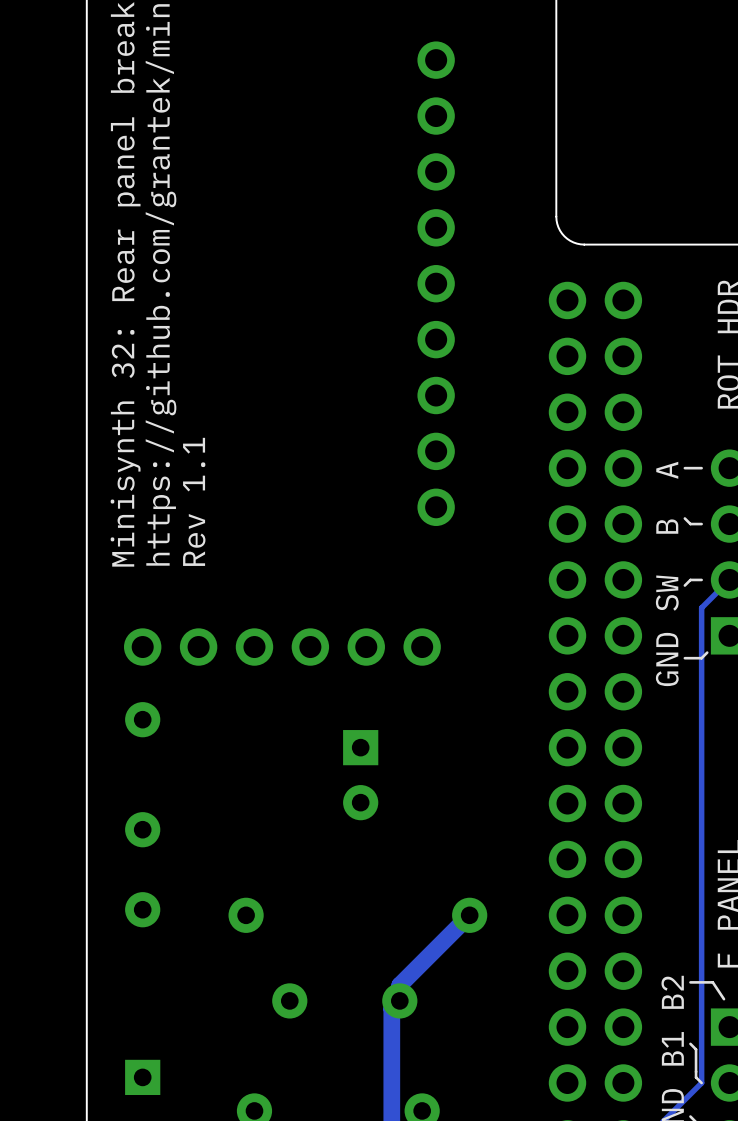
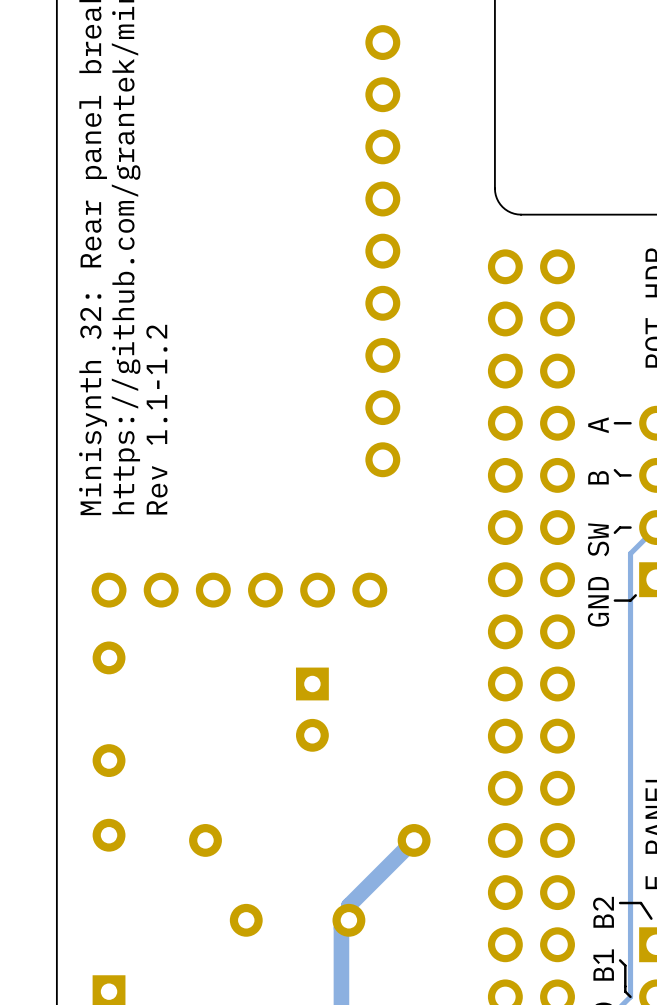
text: Rev 1.1 (194, 501) -> Rev 1.1-1.2 (156, 419)

